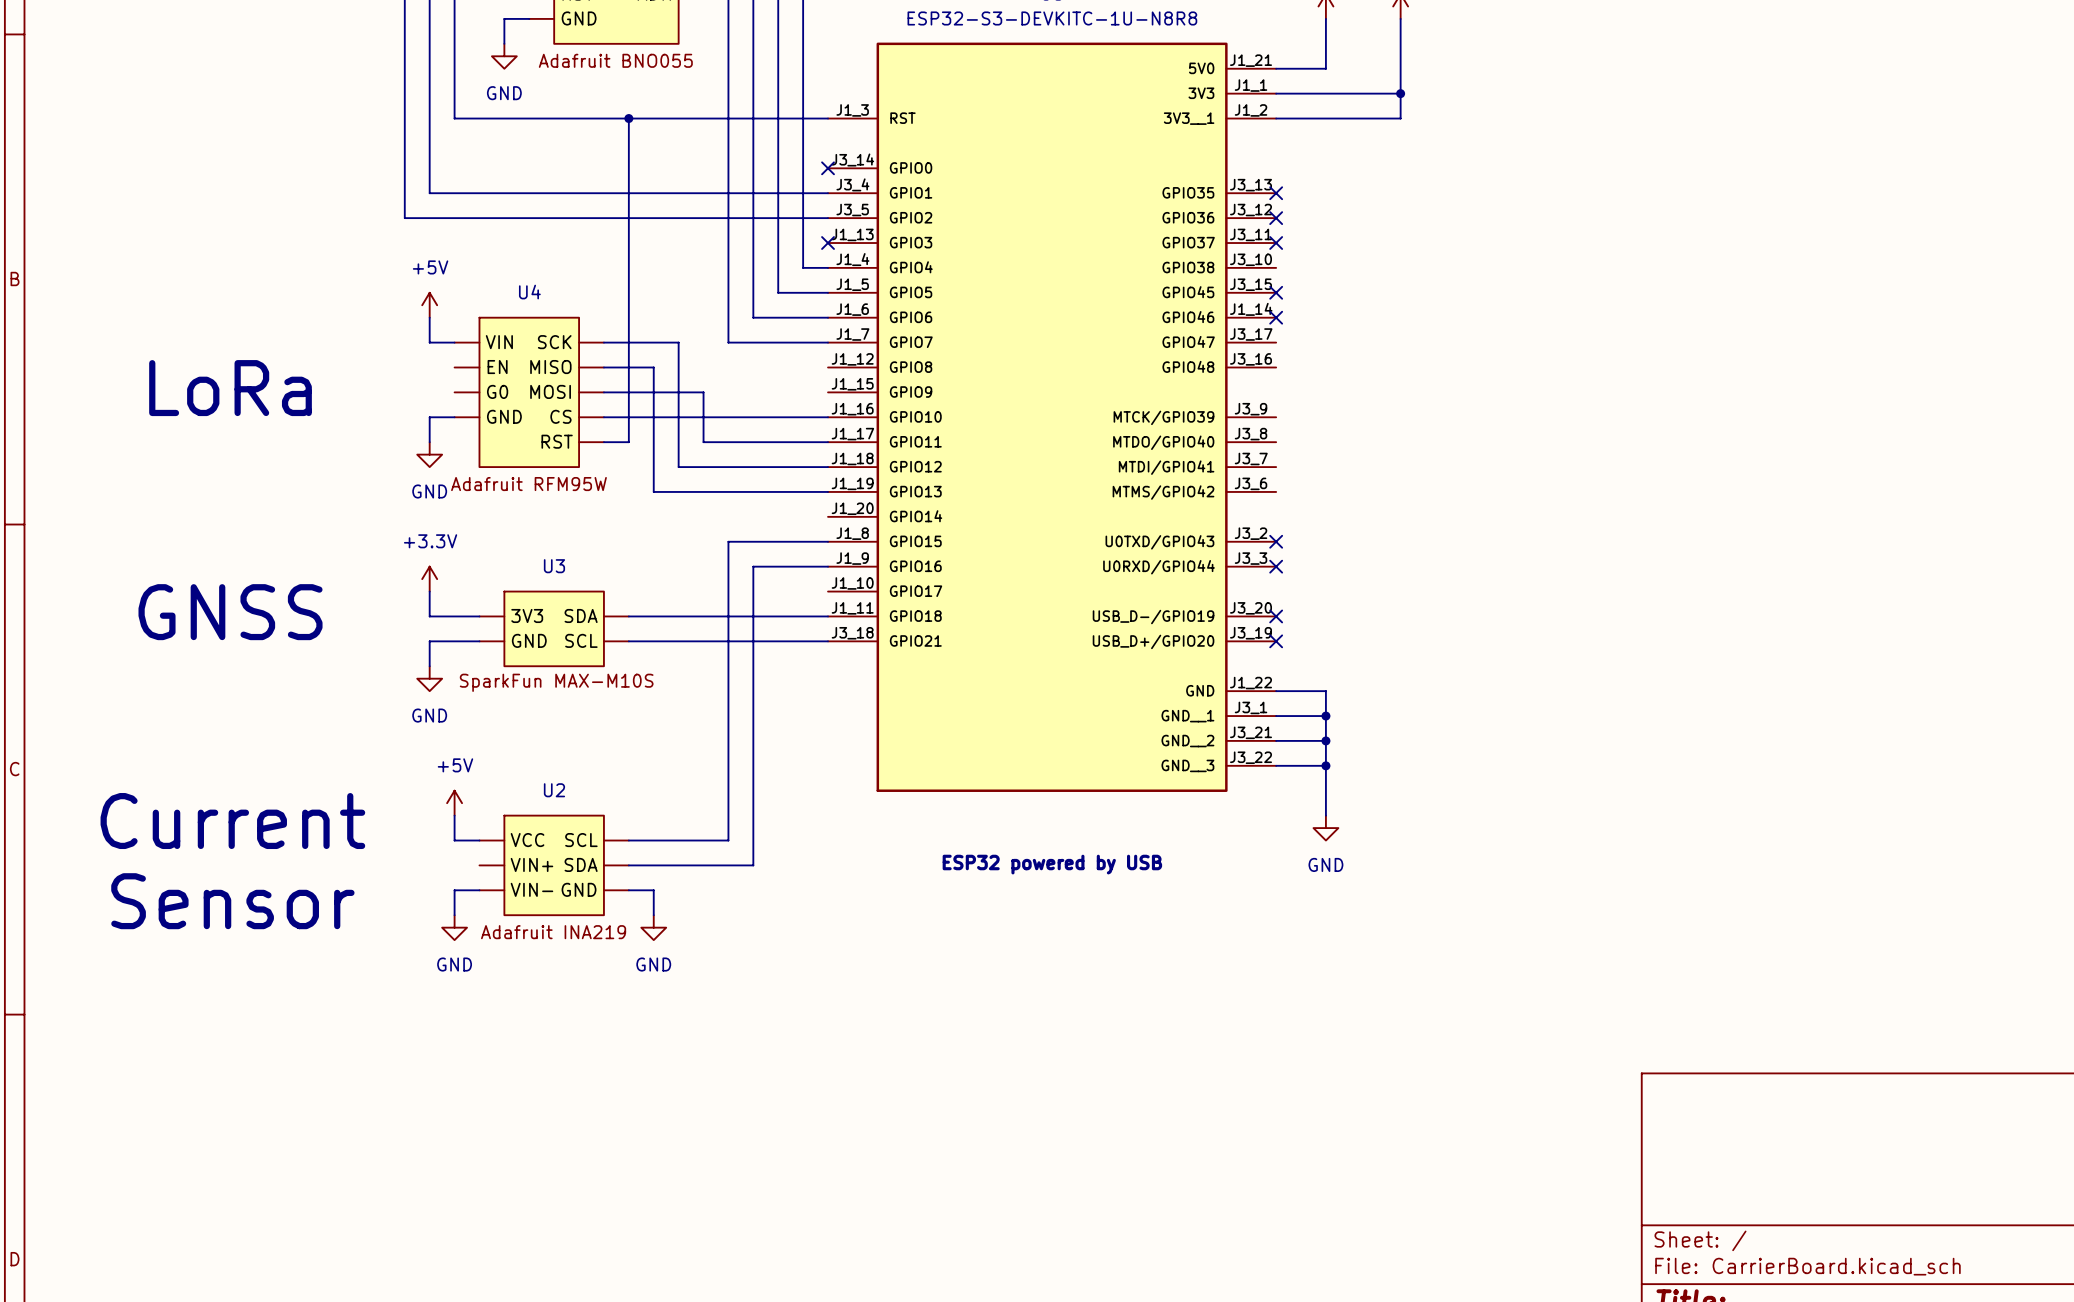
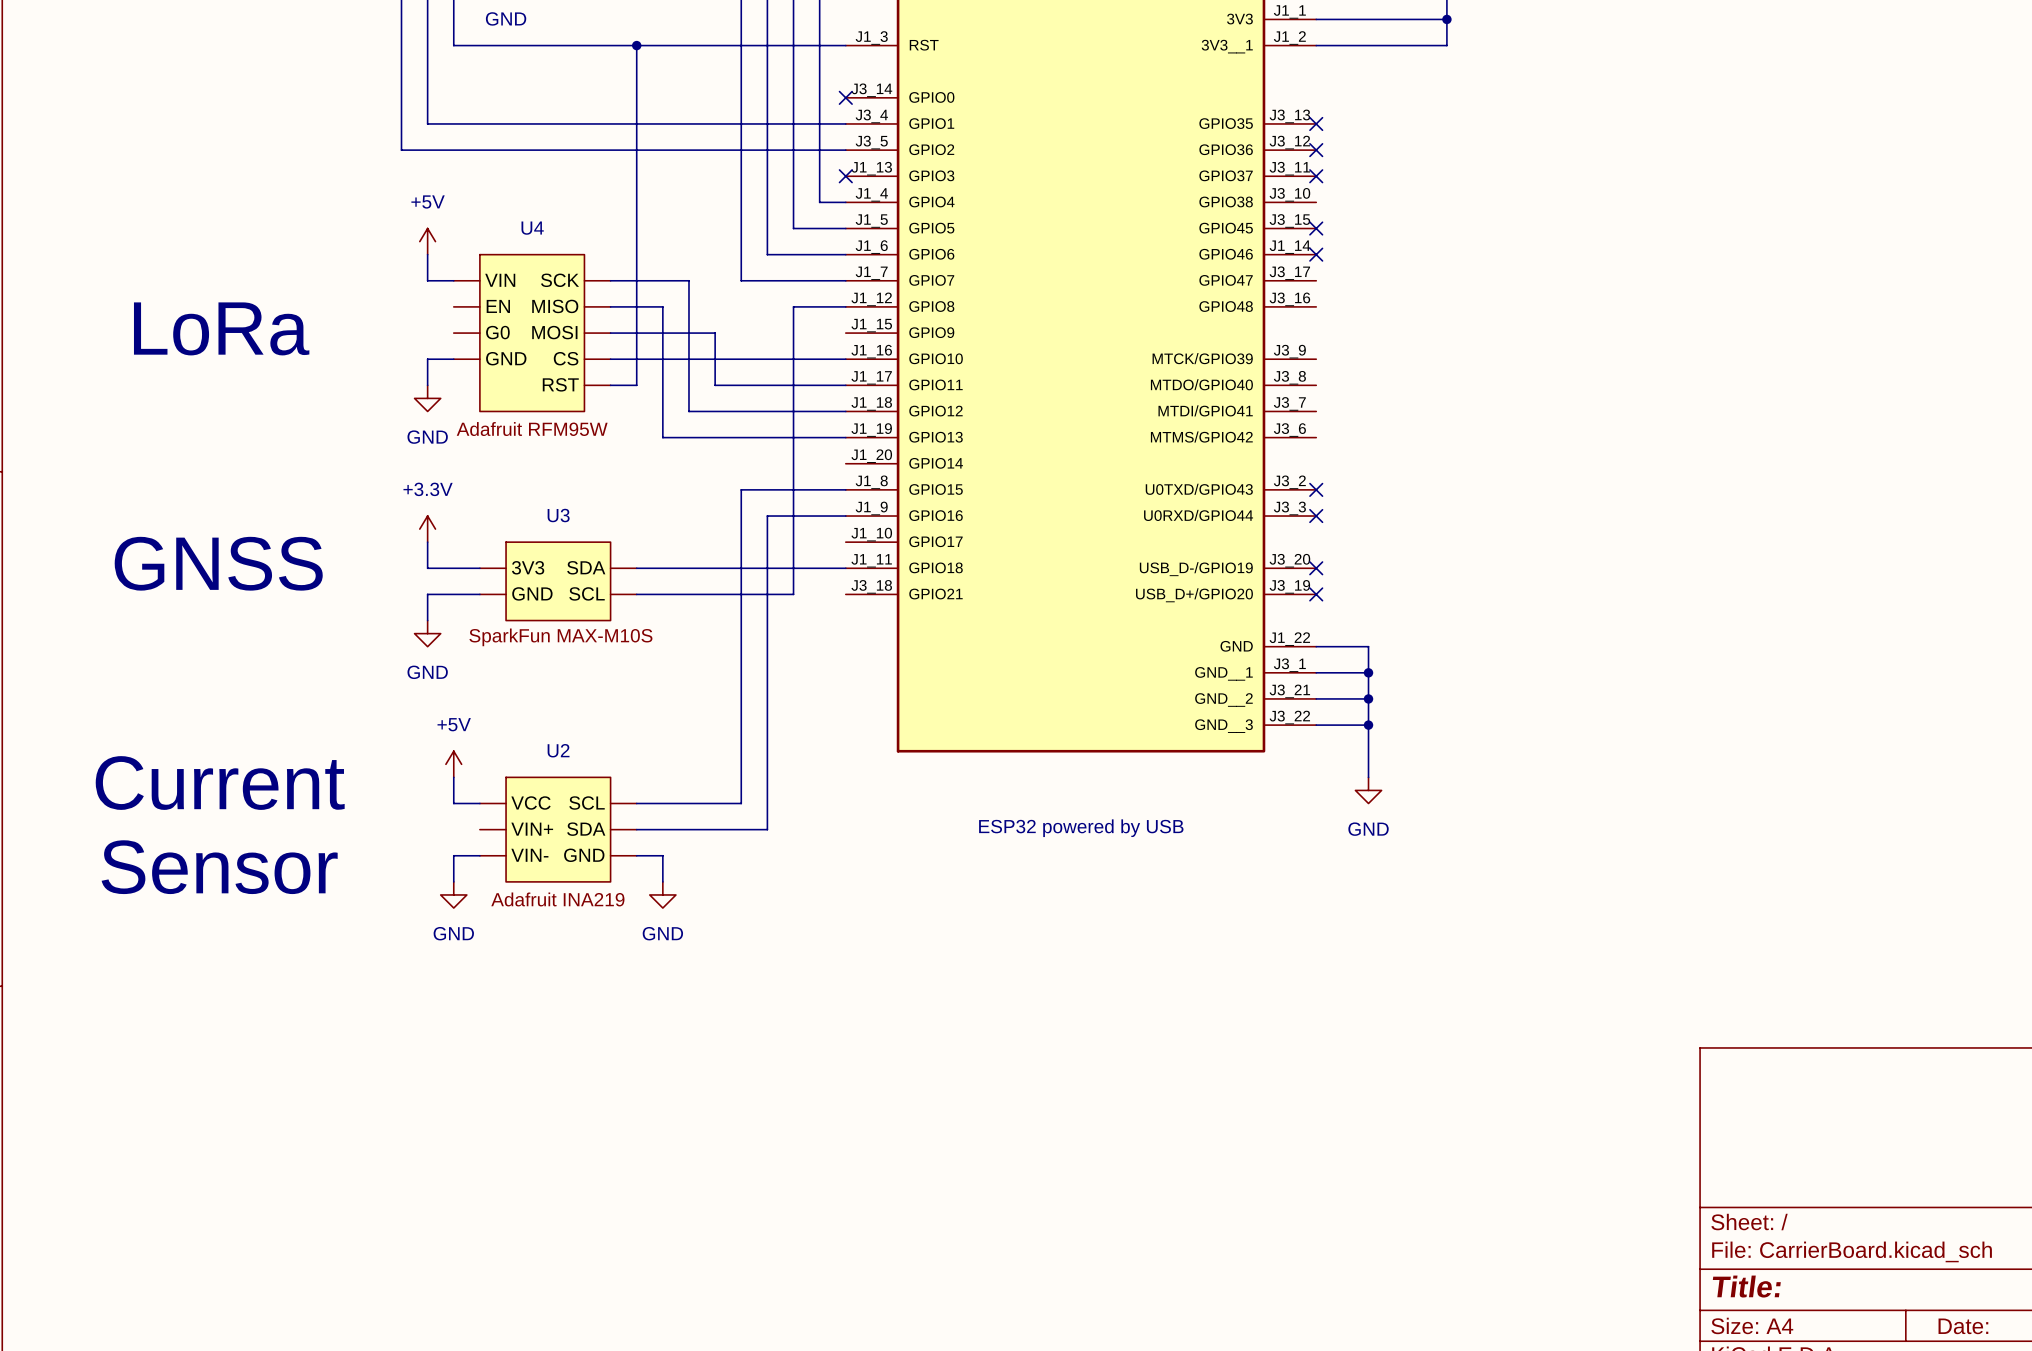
wire: (778, 641) (828, 641) -> (793, 594) (793, 306) (845, 306)

